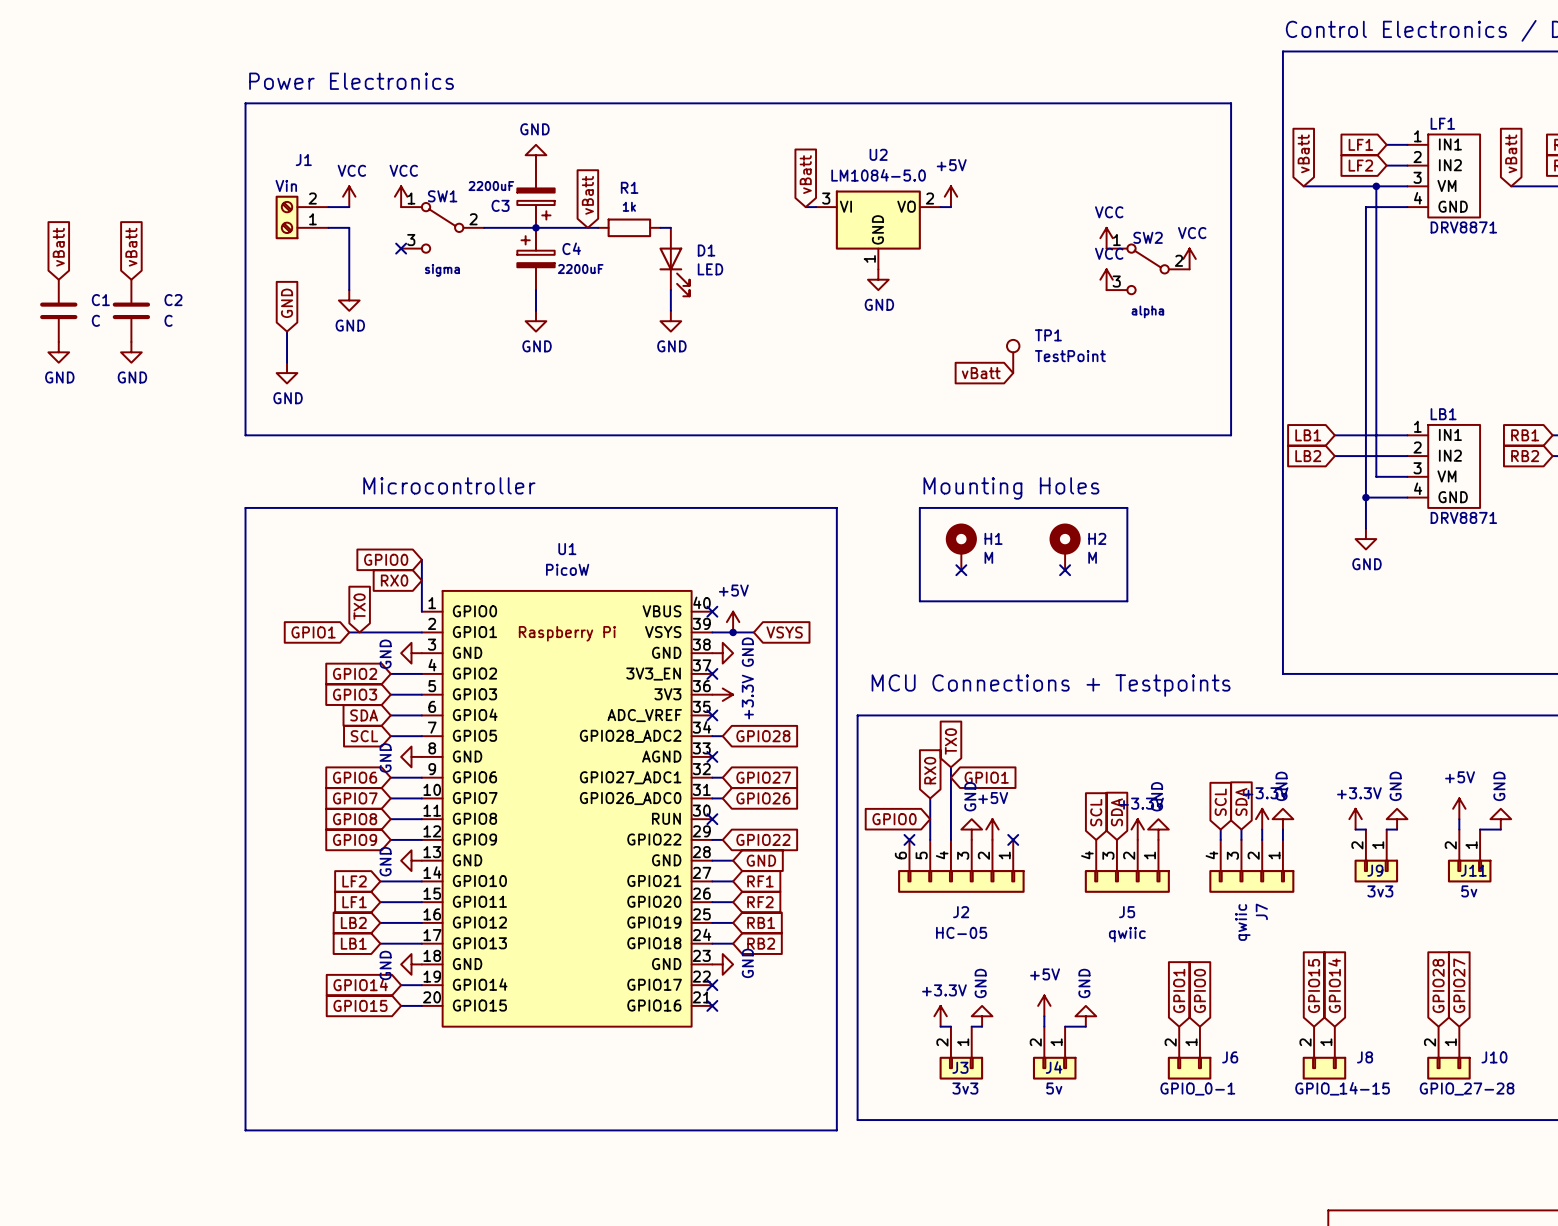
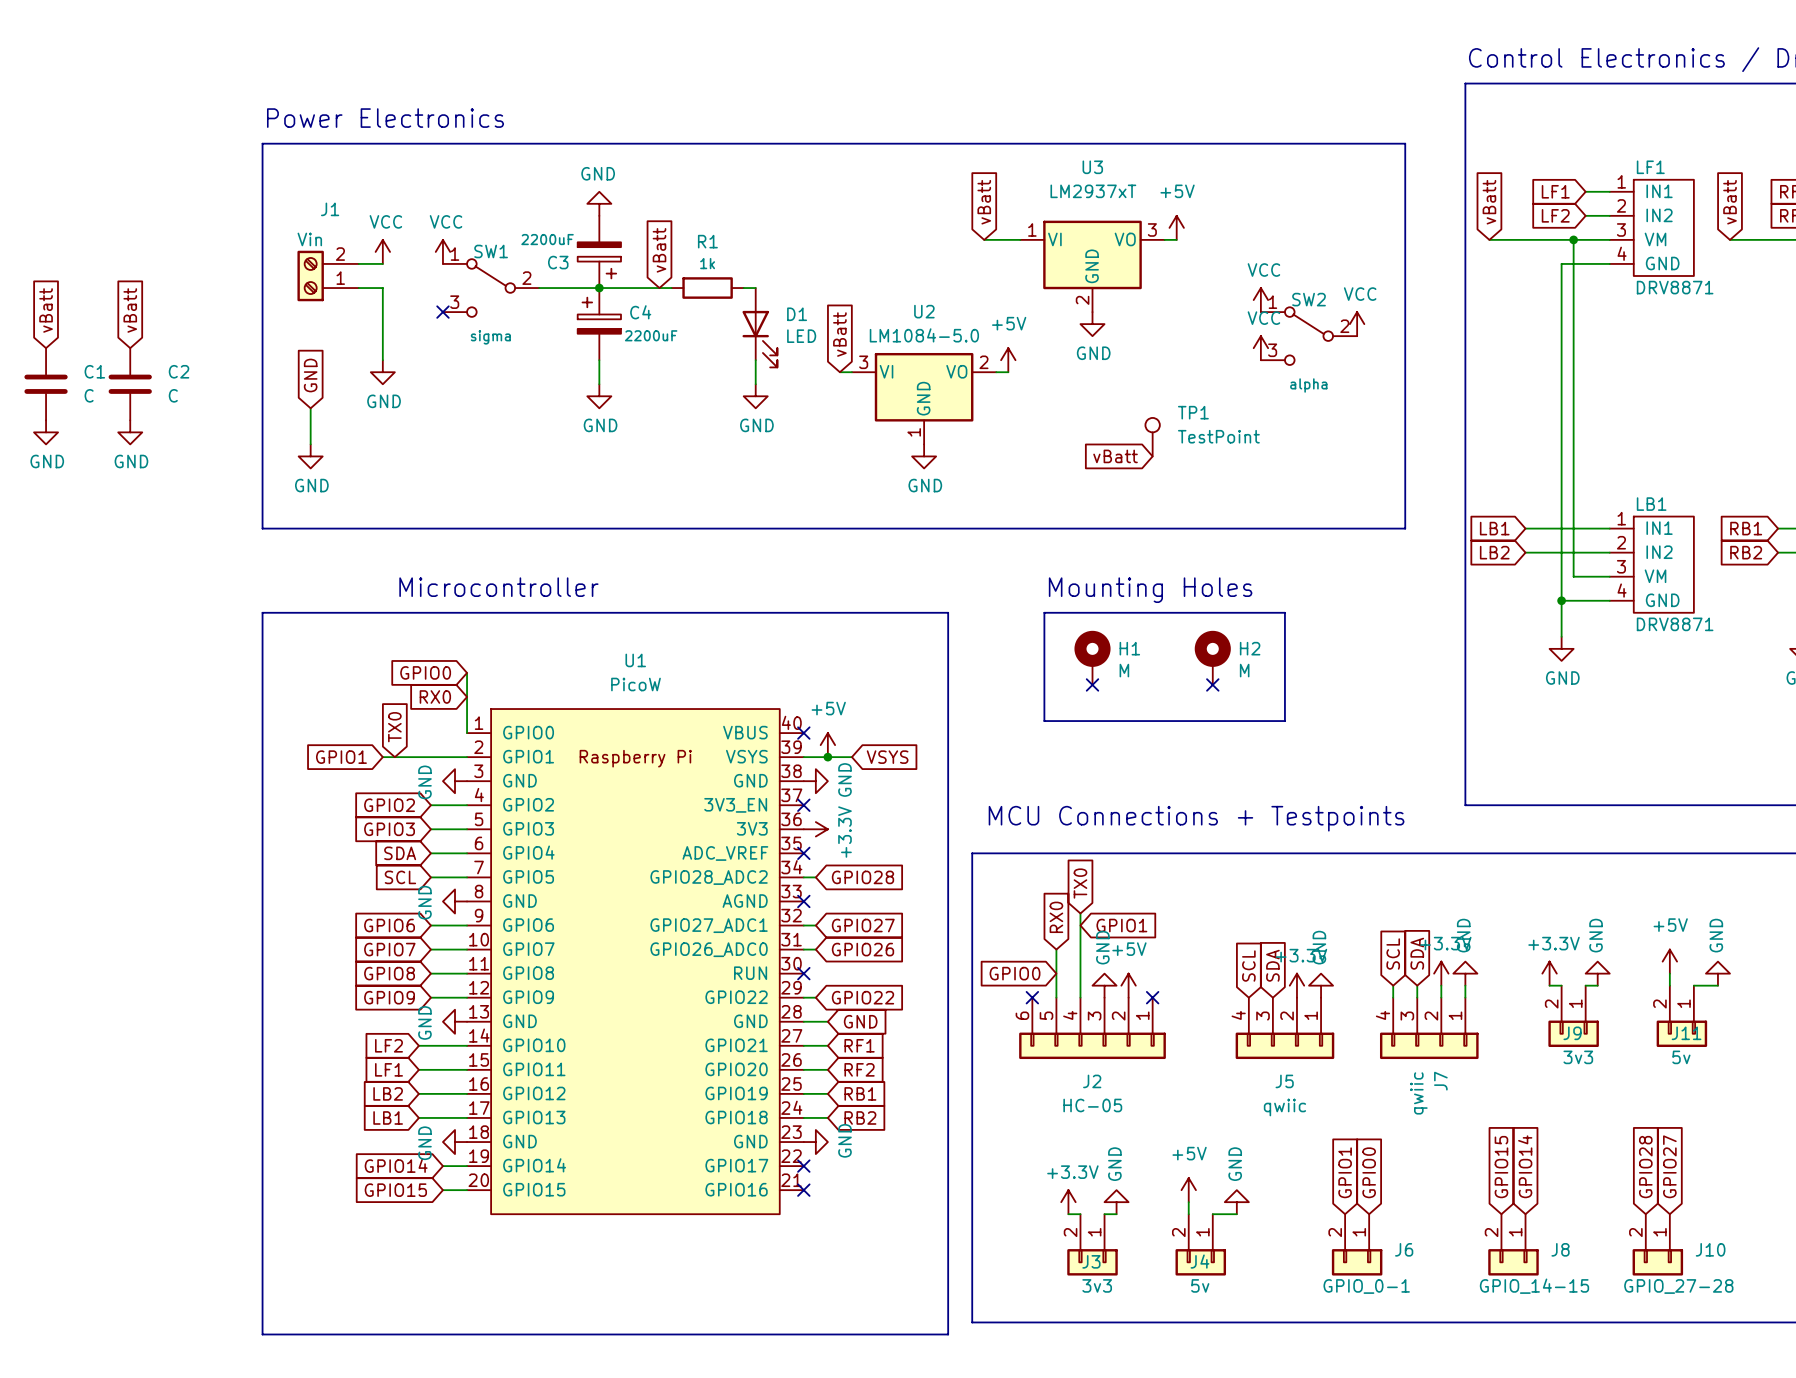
global label: none -> vBatt (984, 202)
global label: vBatt (805, 174) -> none
power symbol: none -> +5V (1176, 227)
wire: none -> (984, 239) (1020, 239)
wire: none -> (1164, 239) (1176, 239)
power symbol: +5V (950, 196) -> none
wire: (805, 207) (816, 207) -> (839, 372) (851, 372)
U3: none -> LM2937xT (1092, 266)
U2 position: (878, 229) -> (924, 398)
power symbol: none -> GND (1092, 324)
global label: none -> vBatt (839, 334)
power symbol: GND (878, 279) -> none
power symbol: none -> +5V (1008, 360)
power symbol: none -> GND (924, 456)

